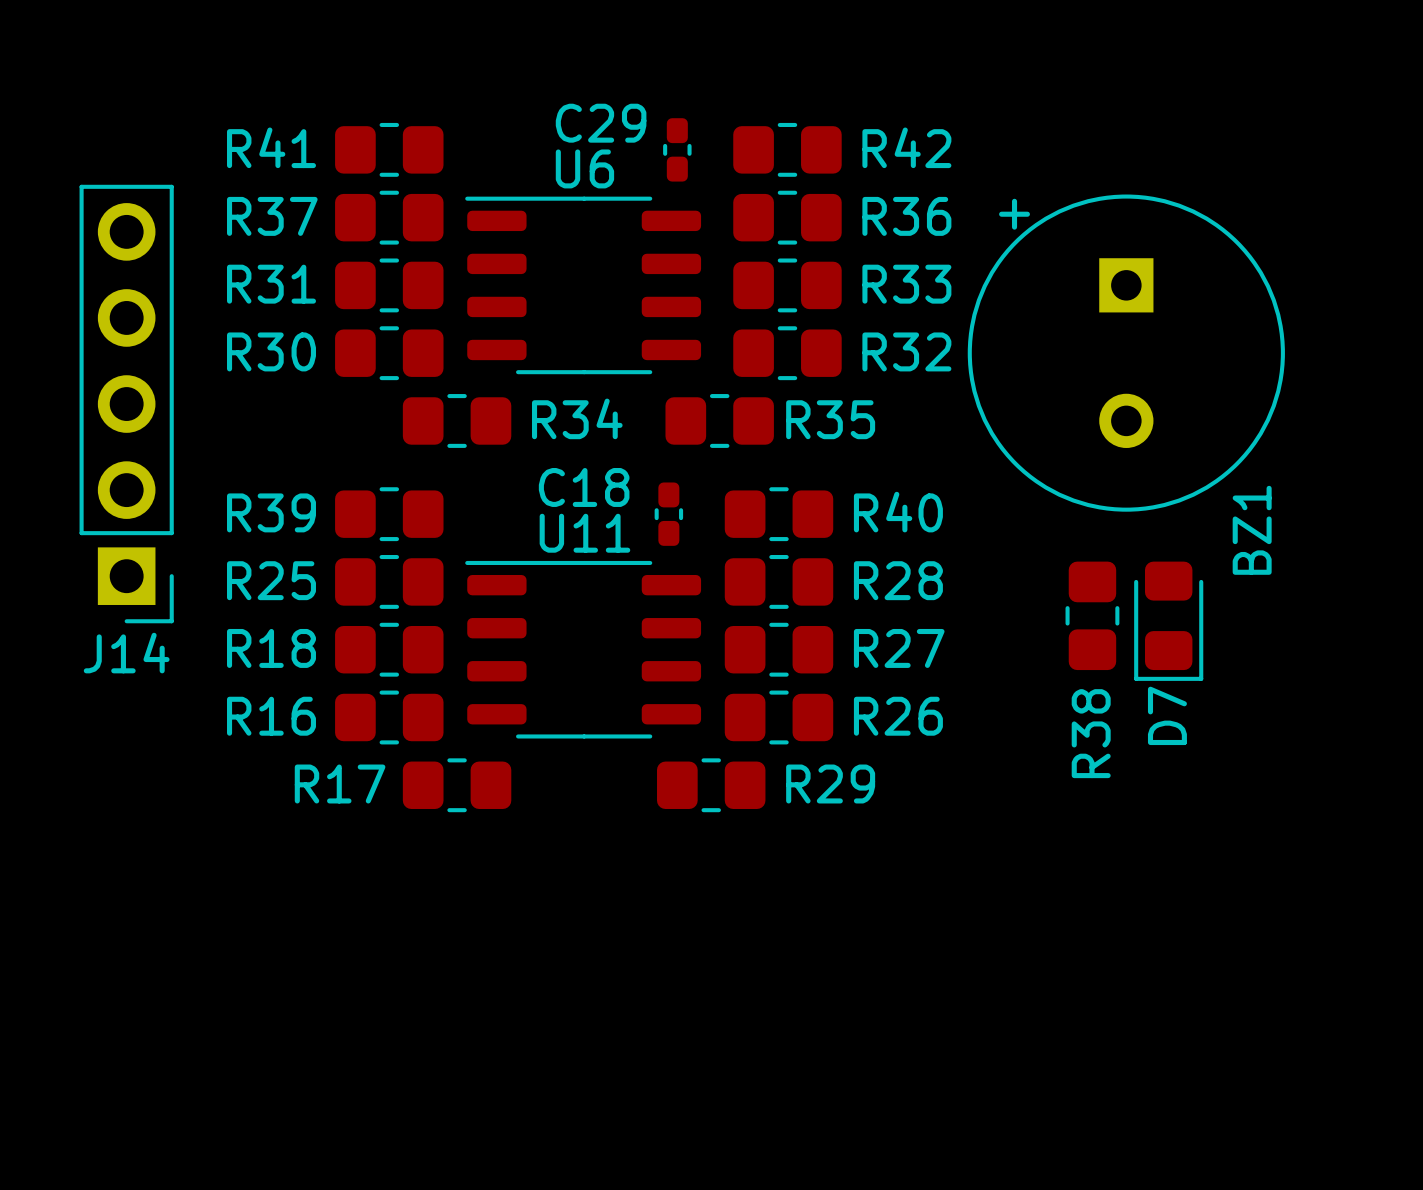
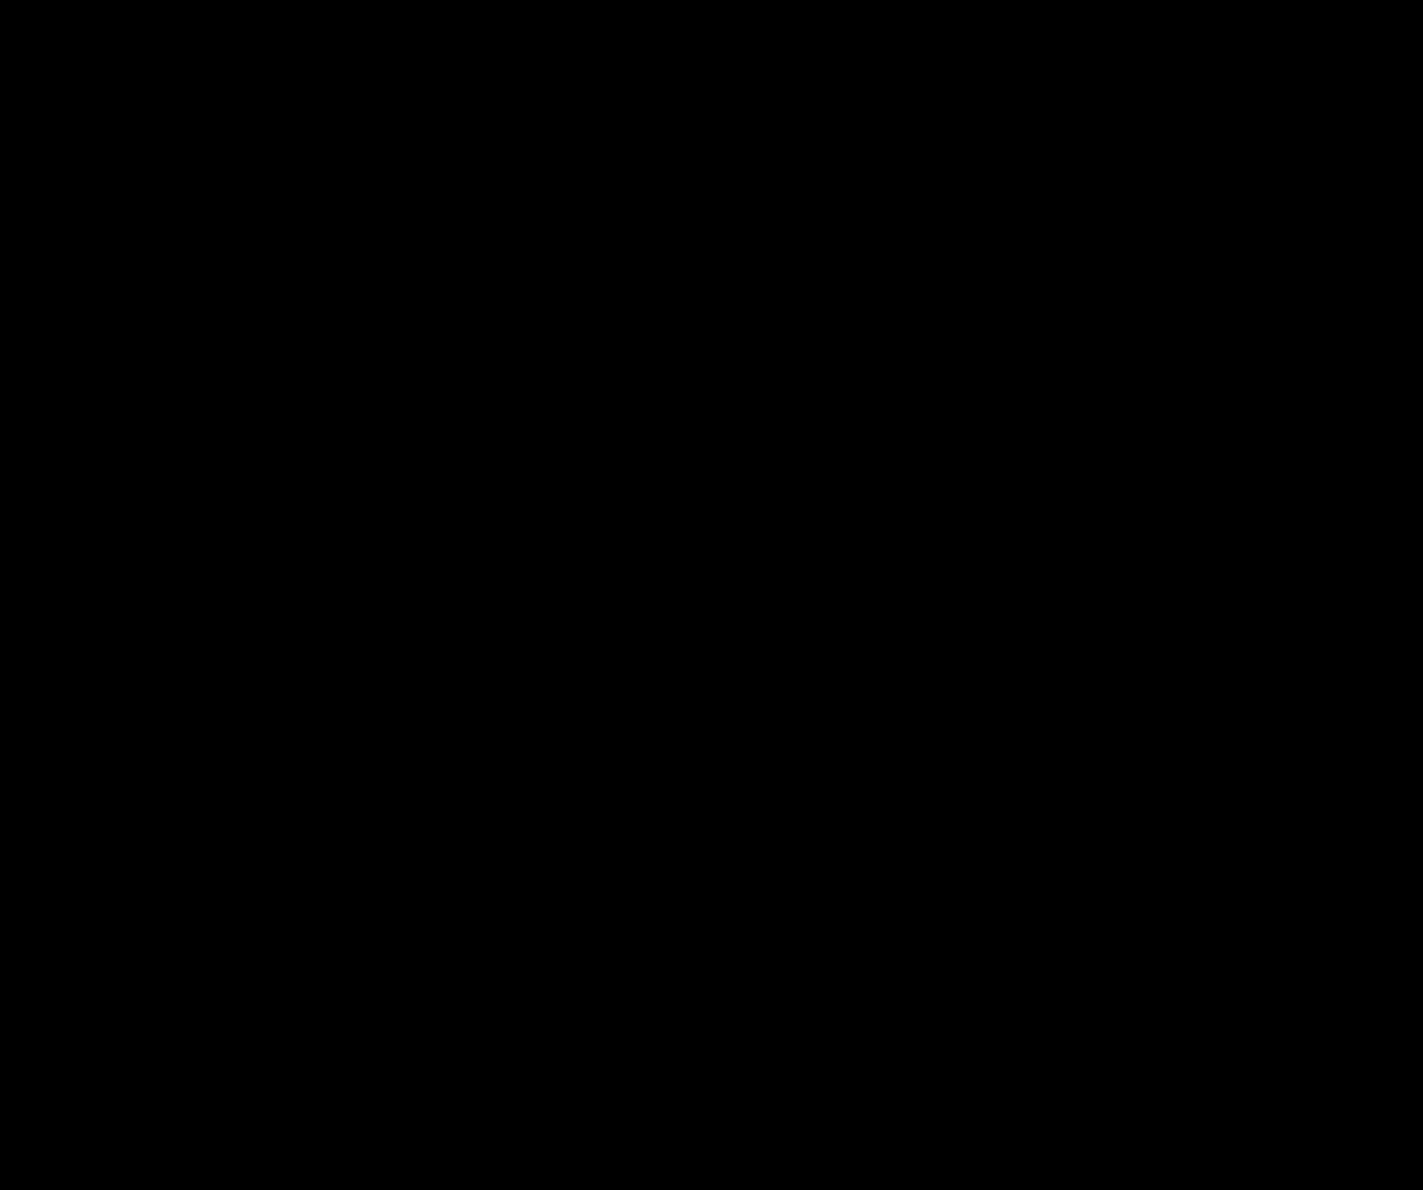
R41: (389, 149) -> none
C29: (677, 149) -> none
R42: (787, 149) -> none
R37: (389, 217) -> none
R36: (787, 217) -> none
R31: (389, 285) -> none
U6: (583, 285) -> none
R33: (787, 285) -> none
R30: (389, 353) -> none
R32: (787, 353) -> none
BZ1: (1126, 353) -> none
J14: (126, 404) -> none
R34: (457, 420) -> none
R35: (719, 420) -> none
R39: (389, 514) -> none
C18: (668, 514) -> none
R40: (779, 514) -> none
R25: (389, 581) -> none
R28: (779, 581) -> none
R38: (1092, 615) -> none
D7: (1168, 621) -> none
R18: (389, 649) -> none
U11: (583, 649) -> none
R27: (779, 649) -> none
R16: (389, 717) -> none
R26: (779, 717) -> none
R17: (457, 785) -> none
R29: (711, 785) -> none

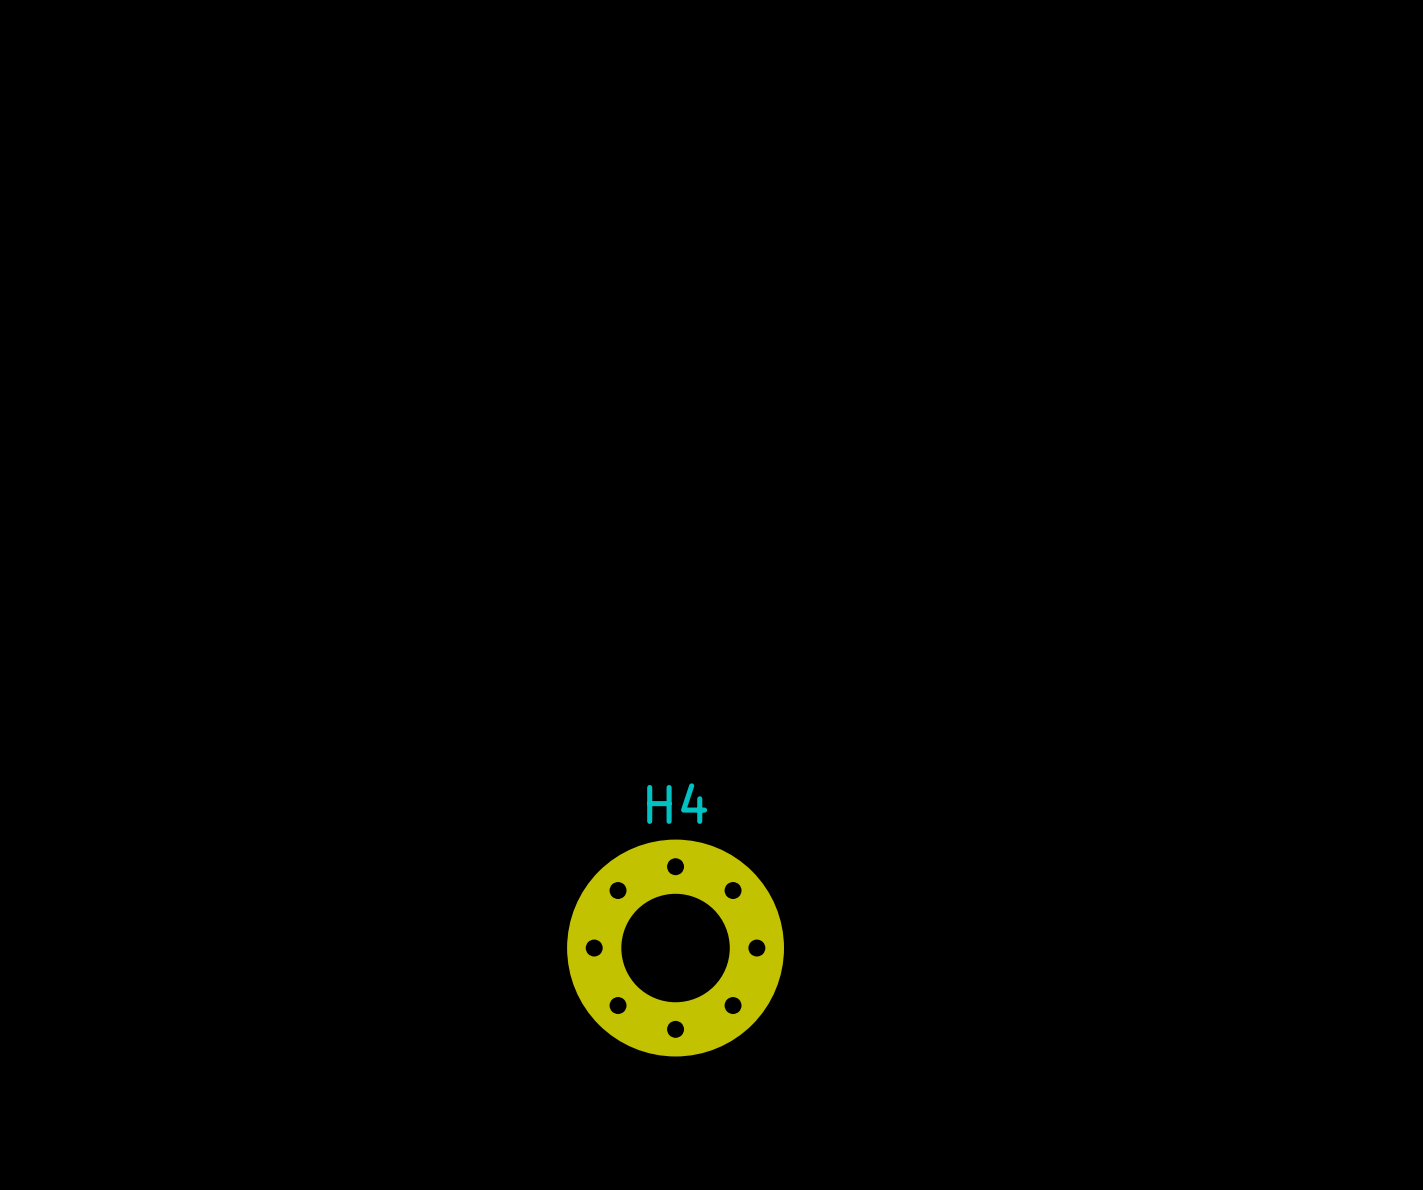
H4: none -> (675, 948)

